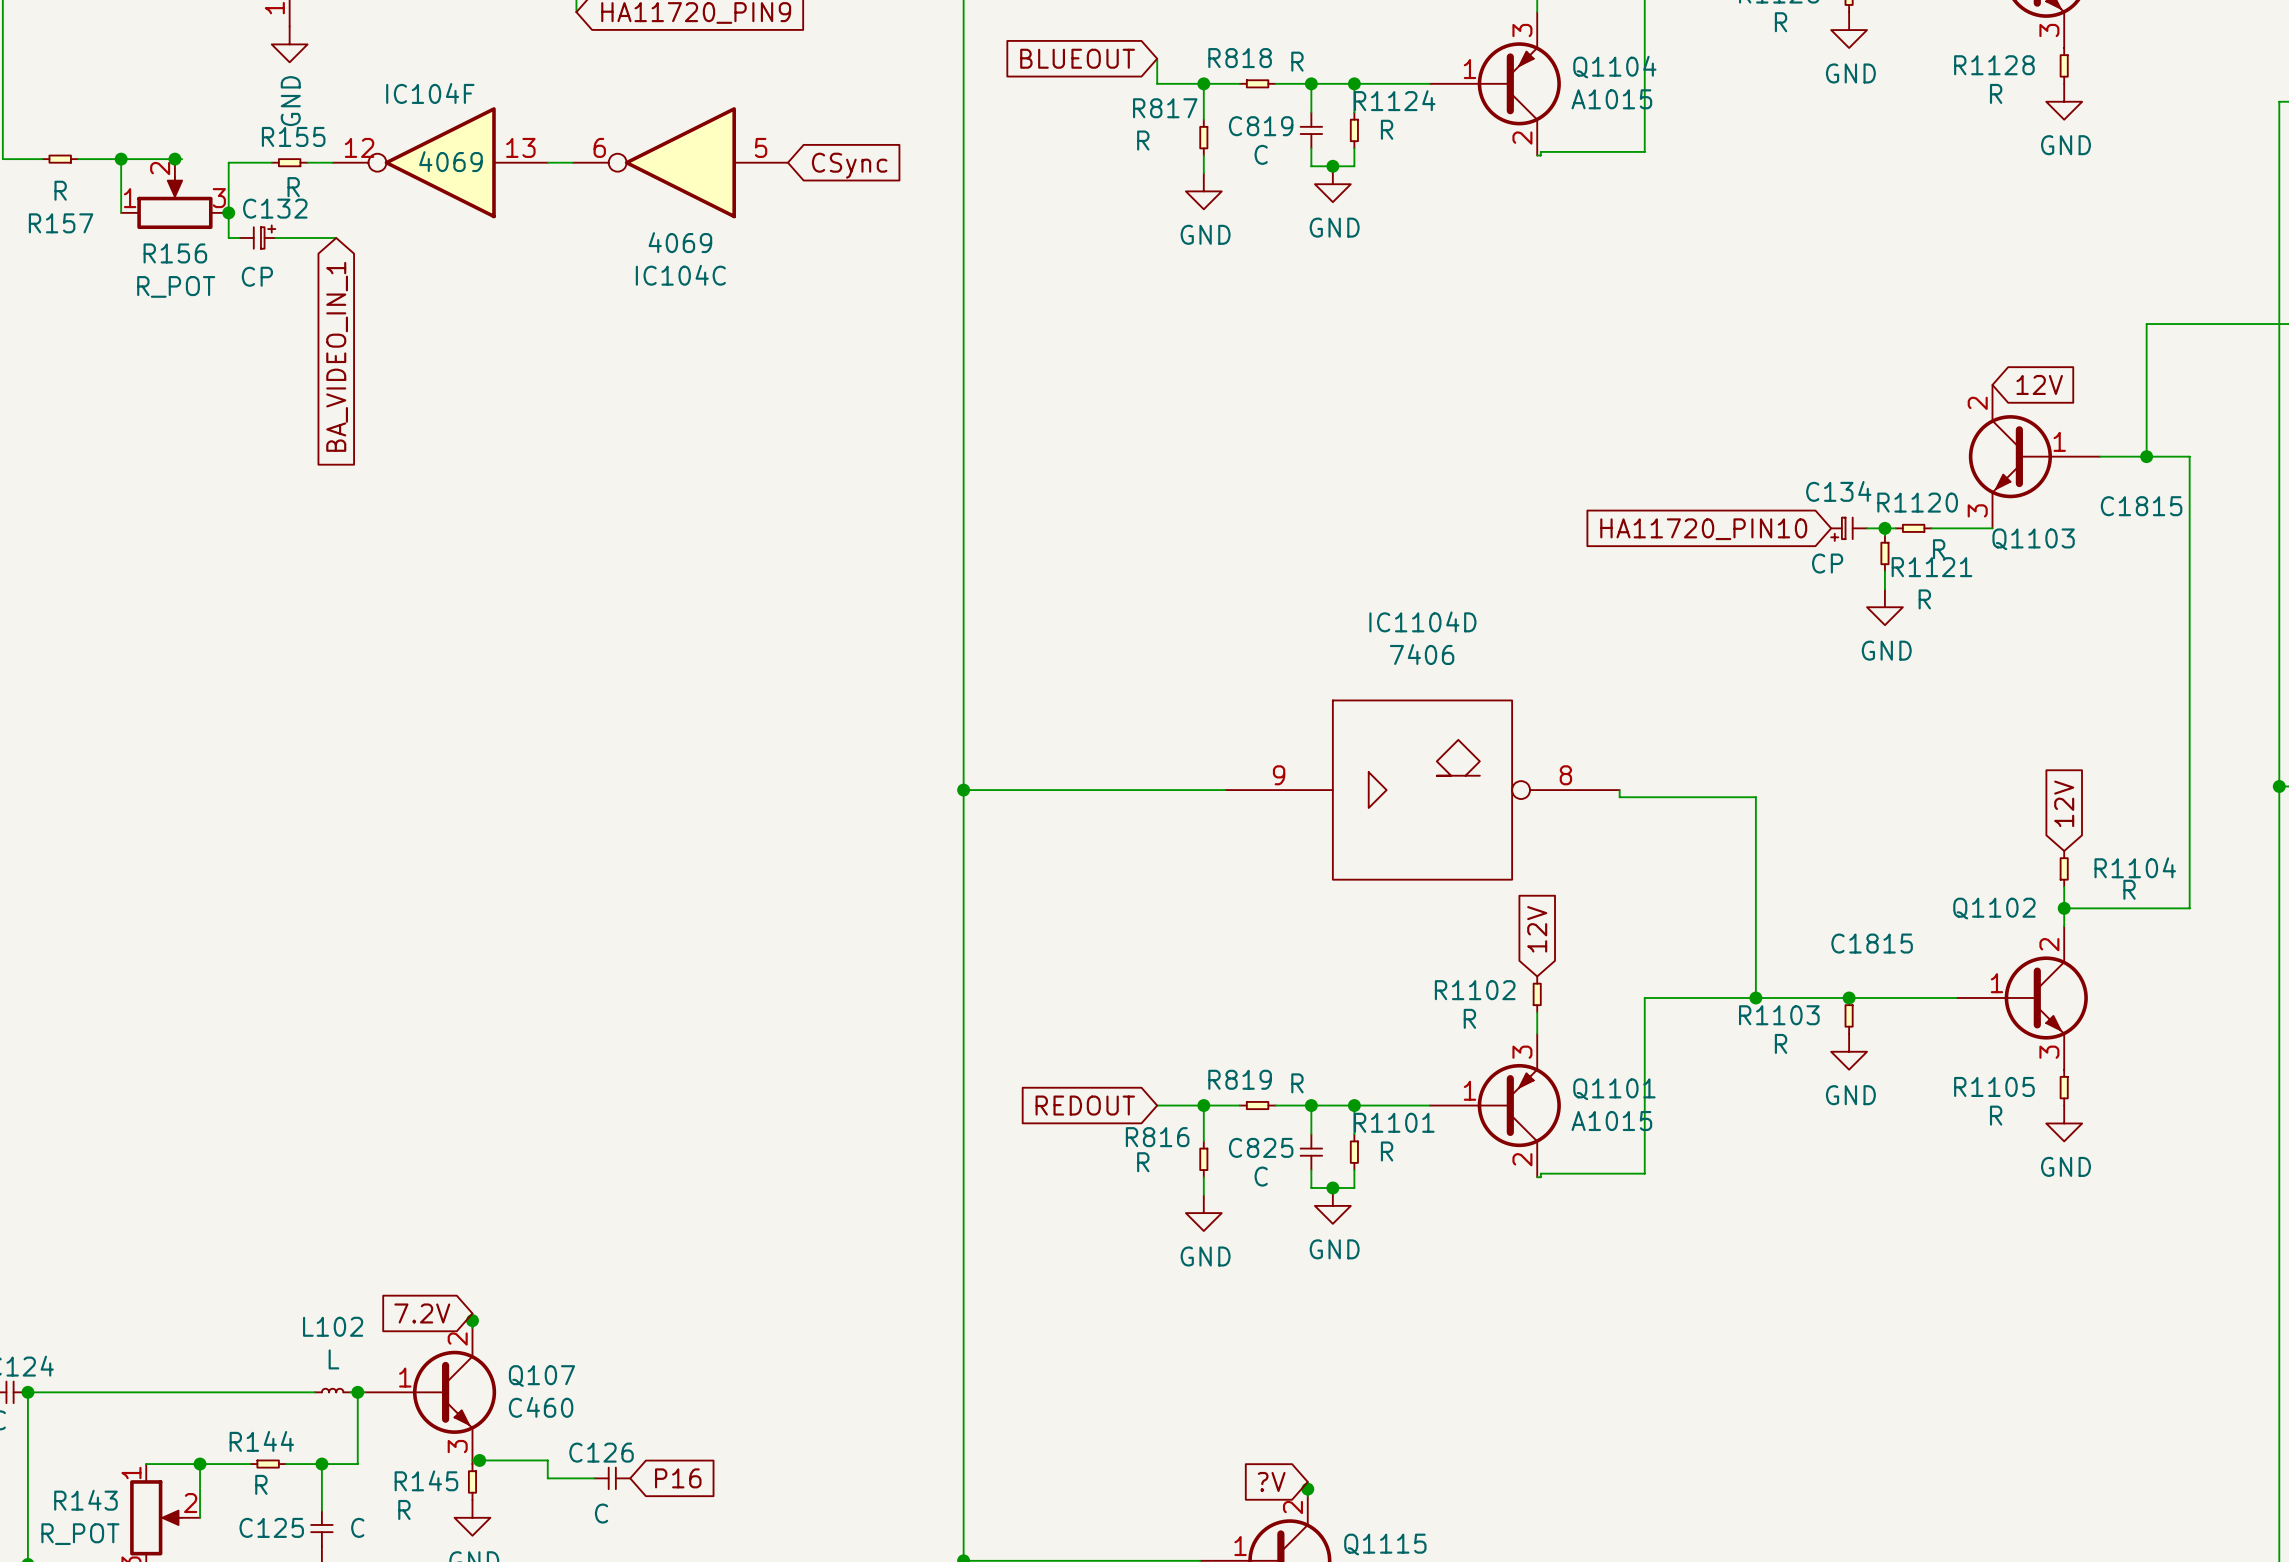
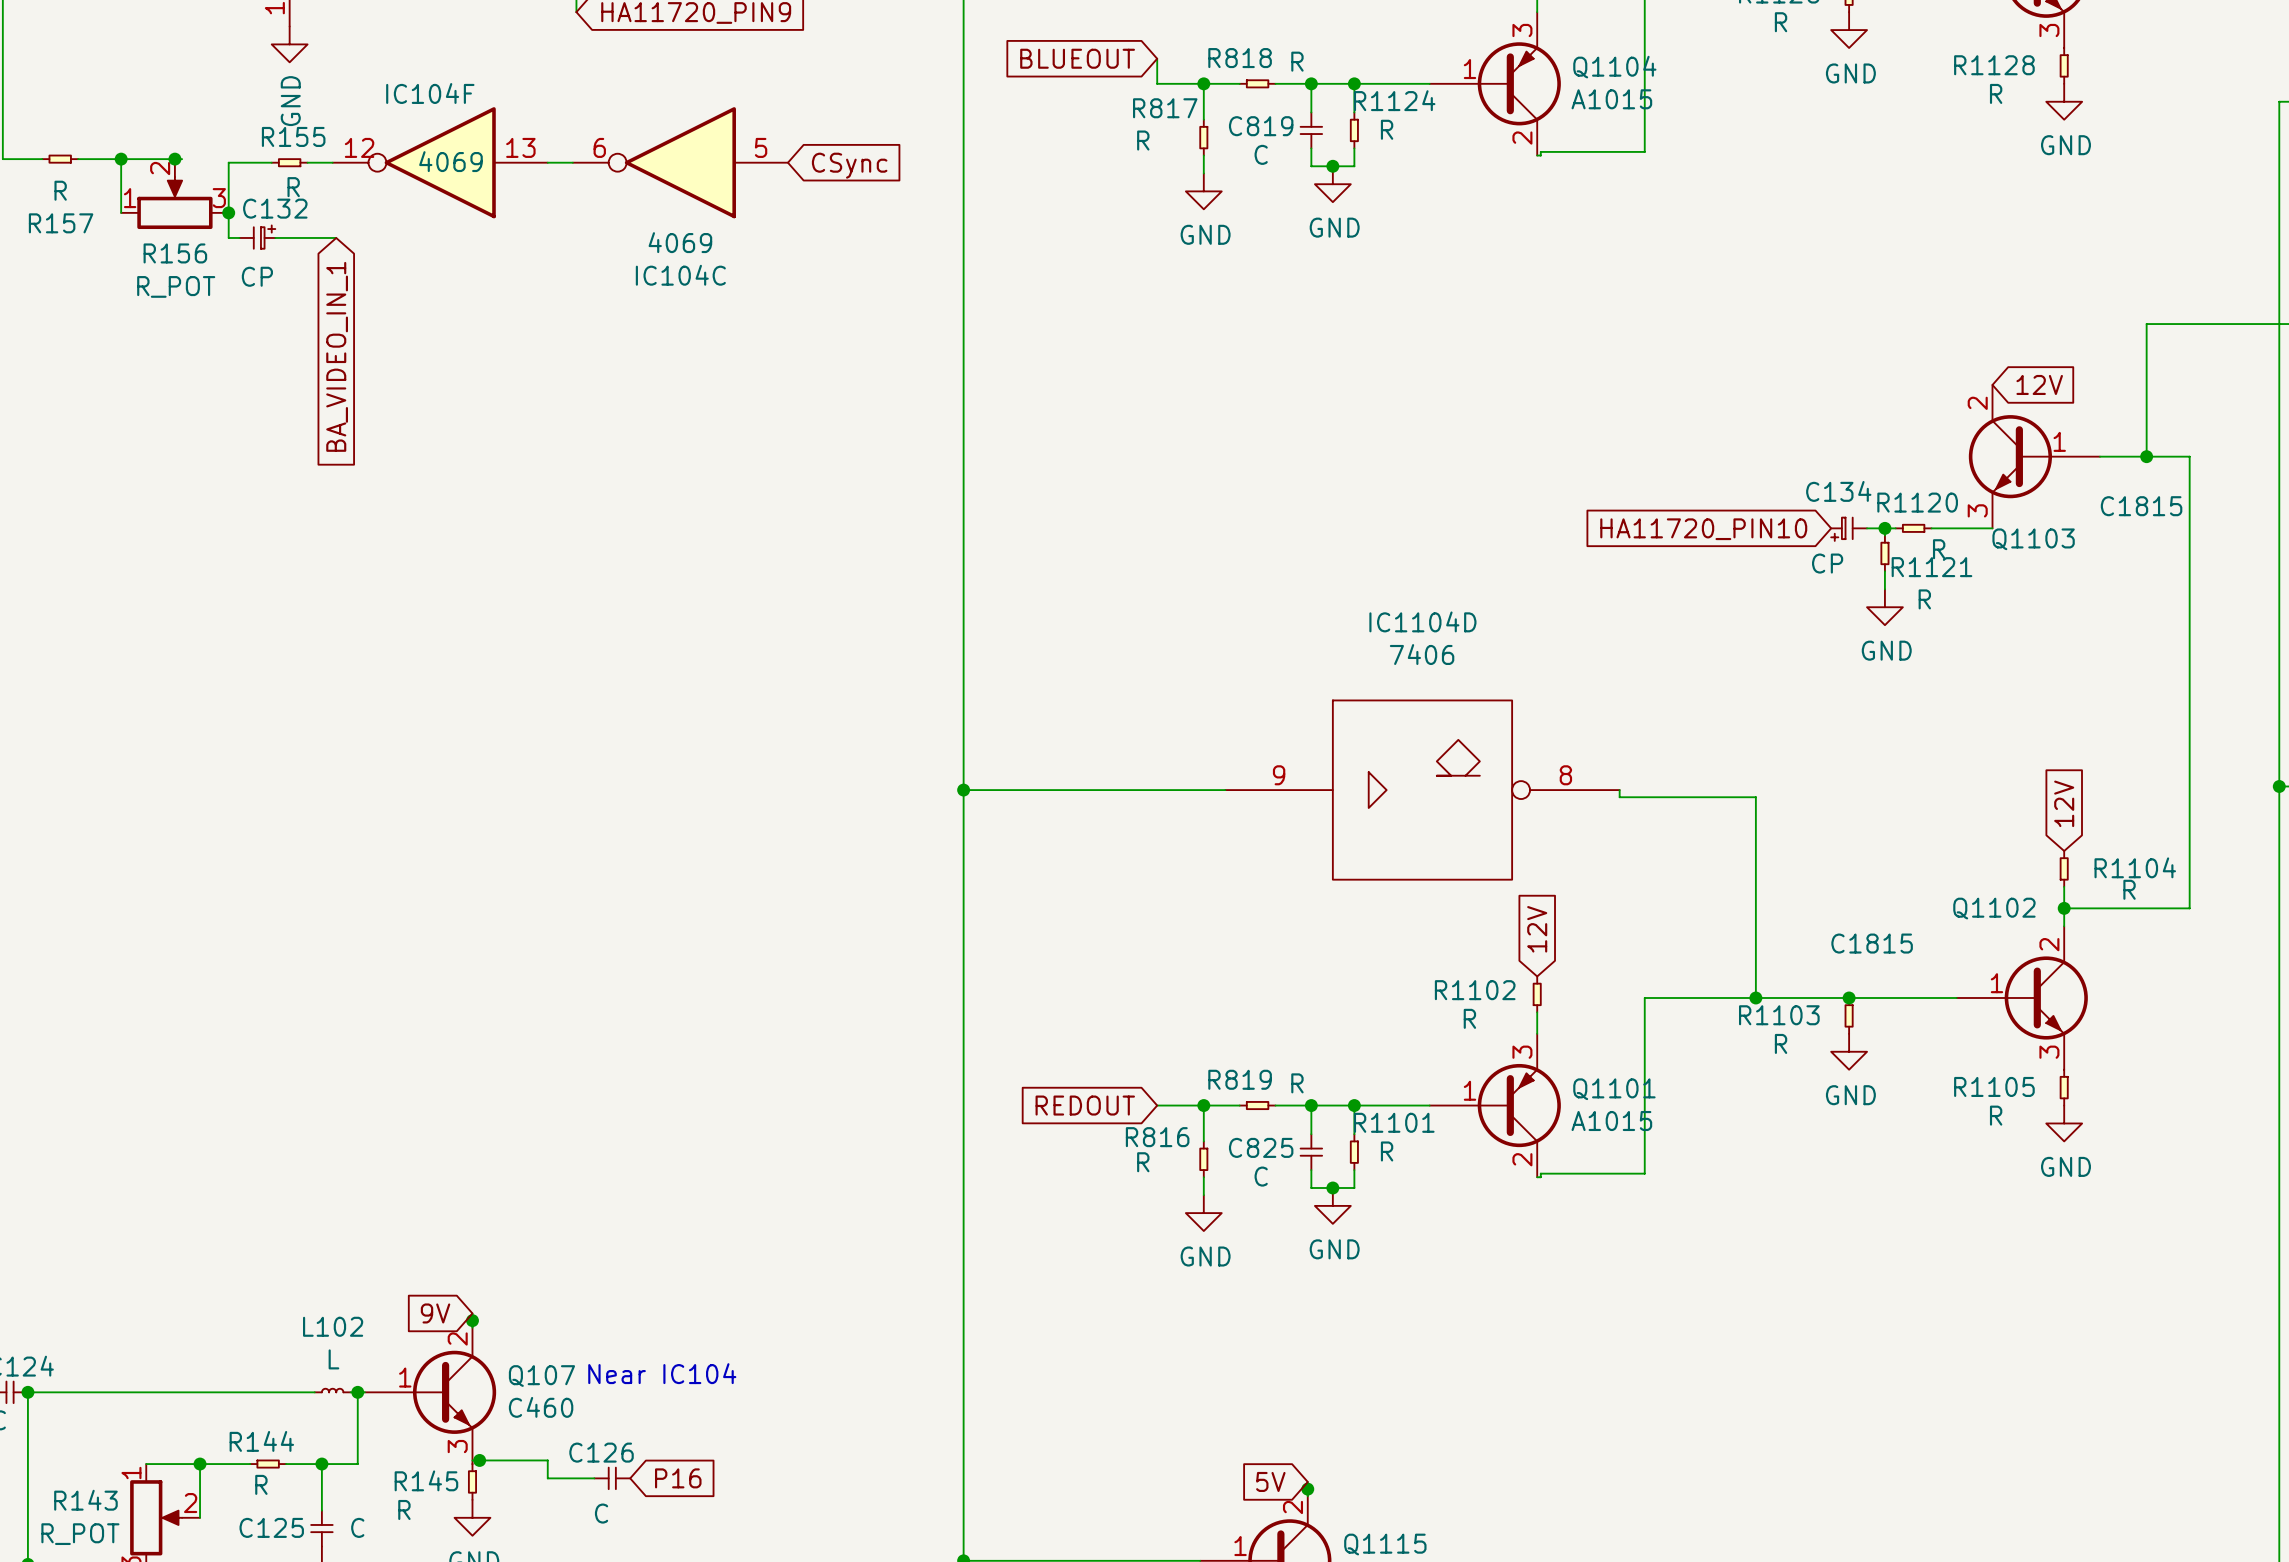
global label: 7.2V (422, 1313) -> 9V (435, 1313)
text: none -> Near IC104 (662, 1373)
global label: ?V (1271, 1481) -> 5V (1270, 1481)

